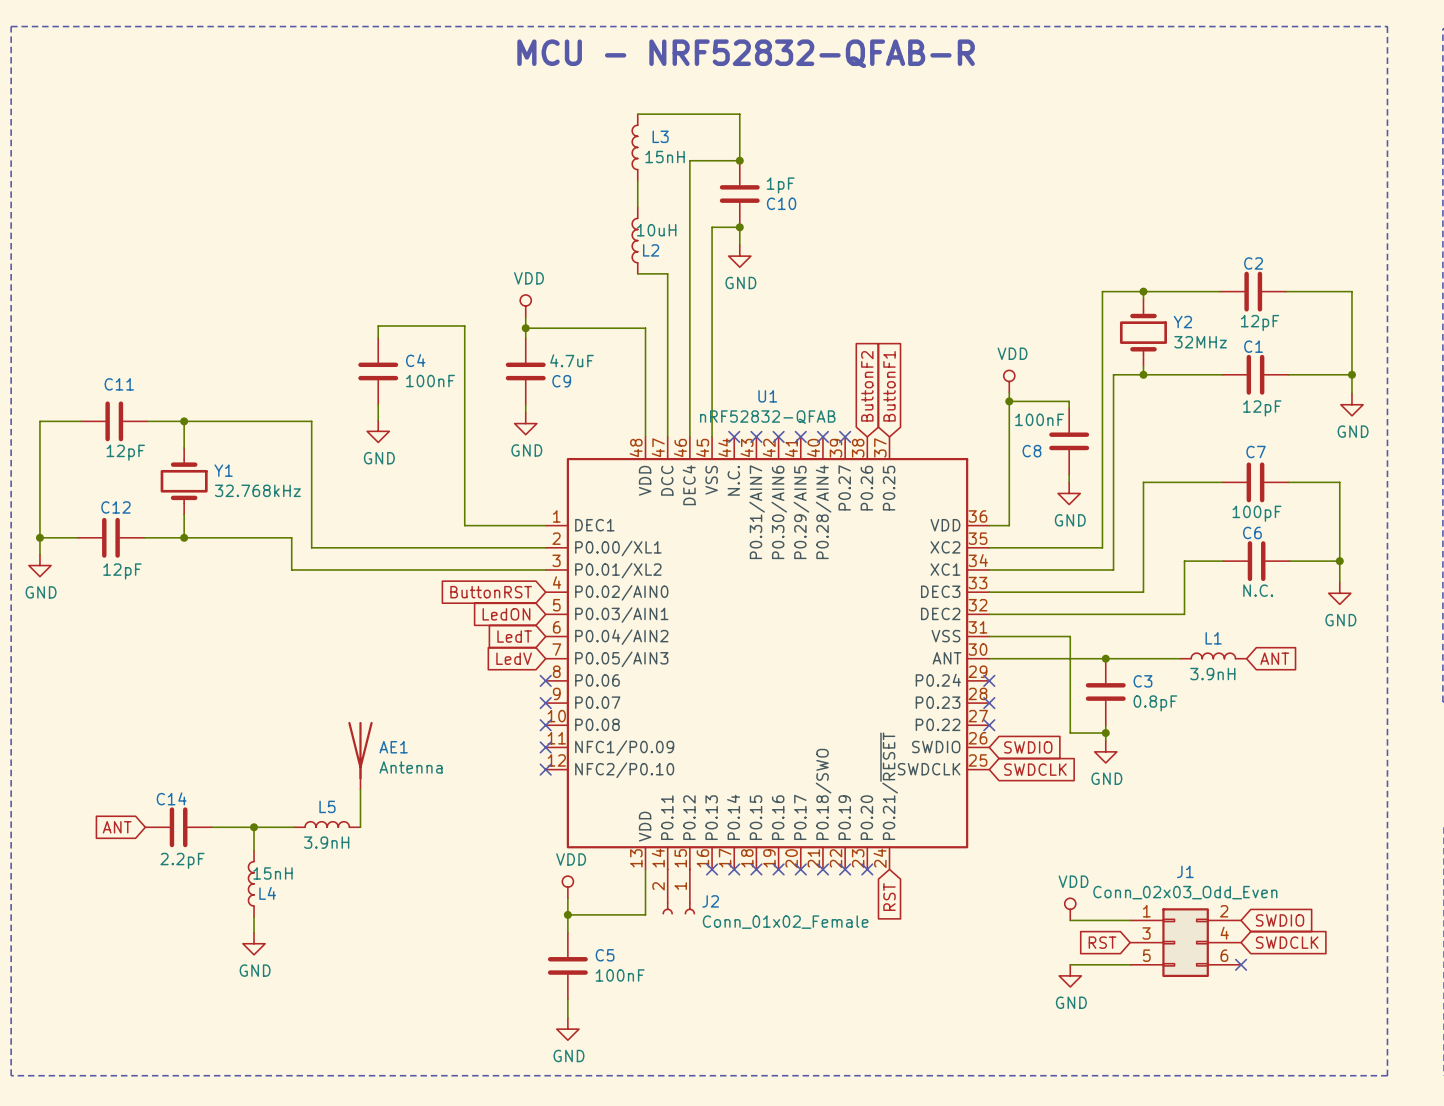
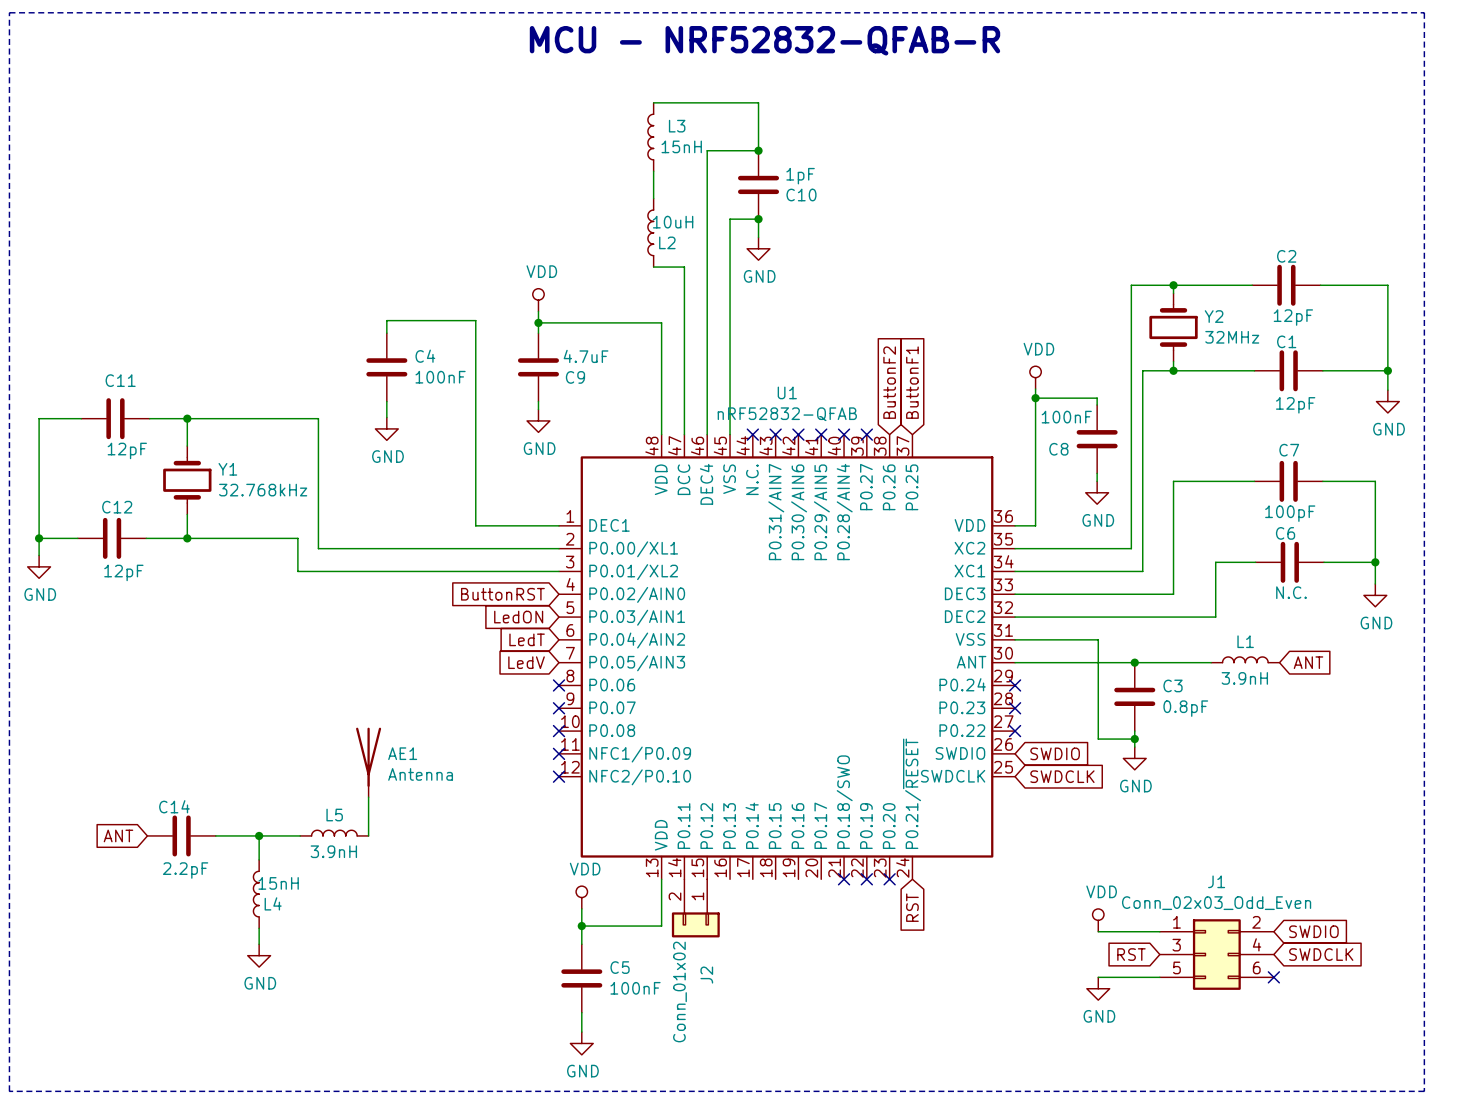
J2 symbol: [662, 869, 695, 915] -> [671, 879, 720, 938]
no-connect mark: (712, 869) -> none
no-connect mark: (734, 869) -> none
no-connect mark: (756, 869) -> none
no-connect mark: (778, 869) -> none
no-connect mark: (800, 869) -> none
J2 name position: J2 (710, 901) -> J2 (706, 975)
J2 value: Conn_01x02_Female (785, 922) -> Conn_01x02 (679, 992)

